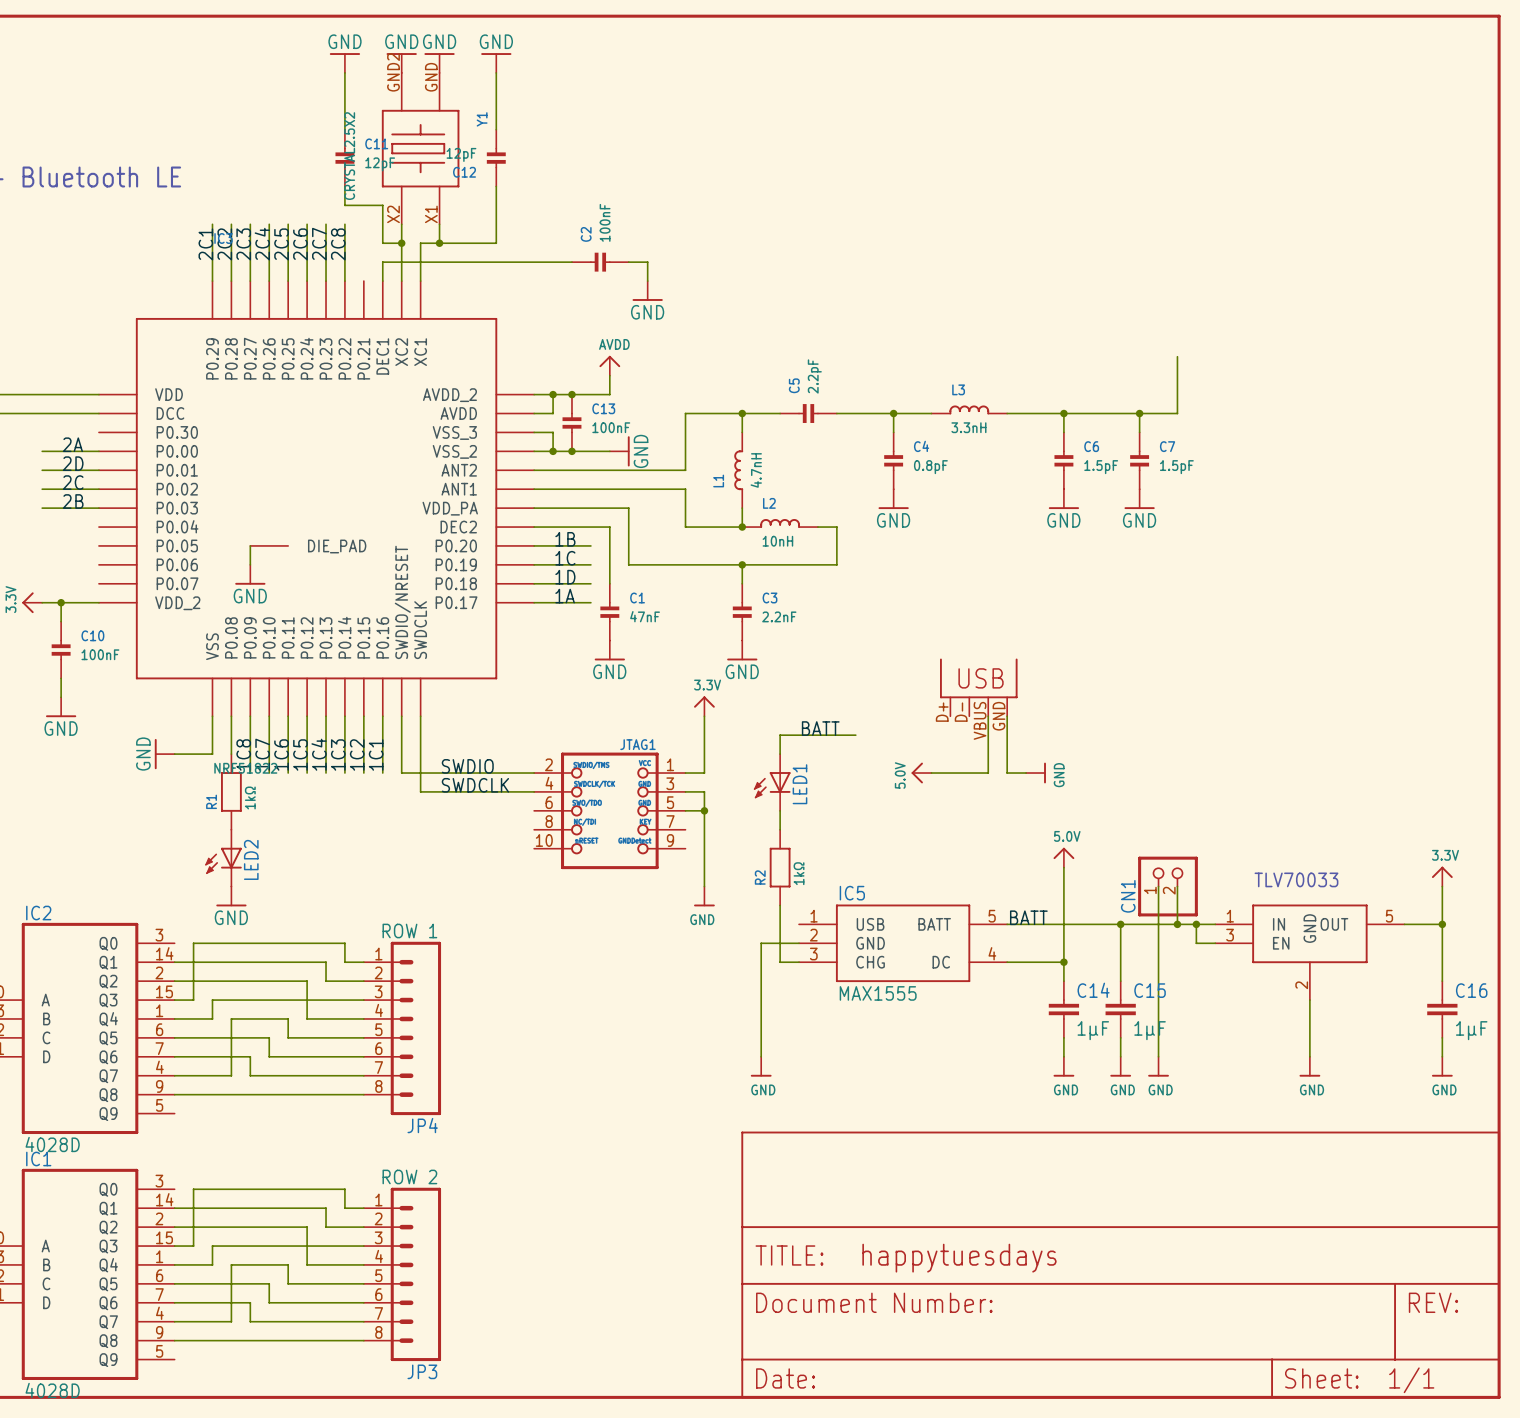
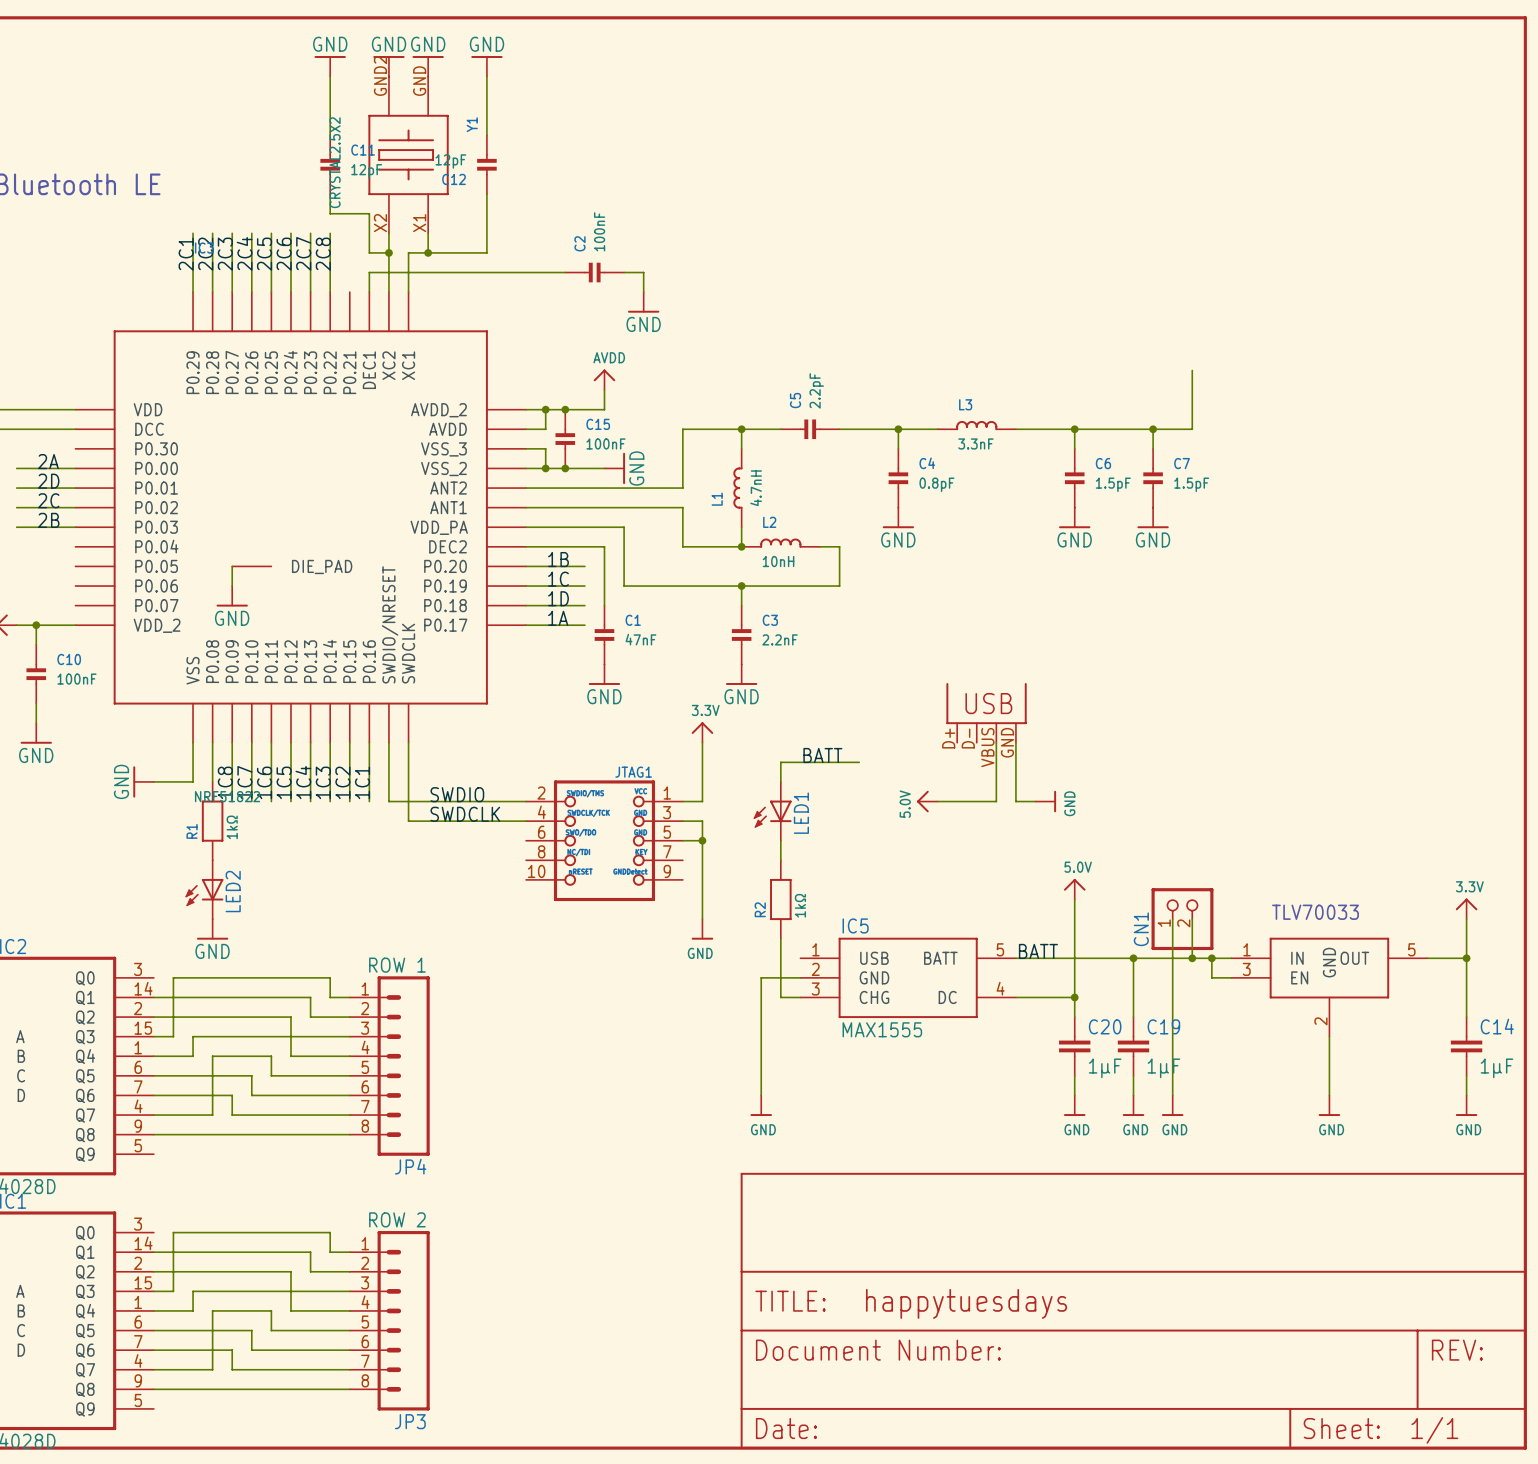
C13 name: C13 (603, 408) -> C15 (598, 424)
L3 value: 3.3nH (968, 427) -> 3.3nF (975, 443)
C14 name: C14 (1093, 990) -> C20 (1105, 1026)
C15 name: C15 (1150, 990) -> C19 (1163, 1026)
C16 name: C16 (1471, 990) -> C14 (1497, 1026)

